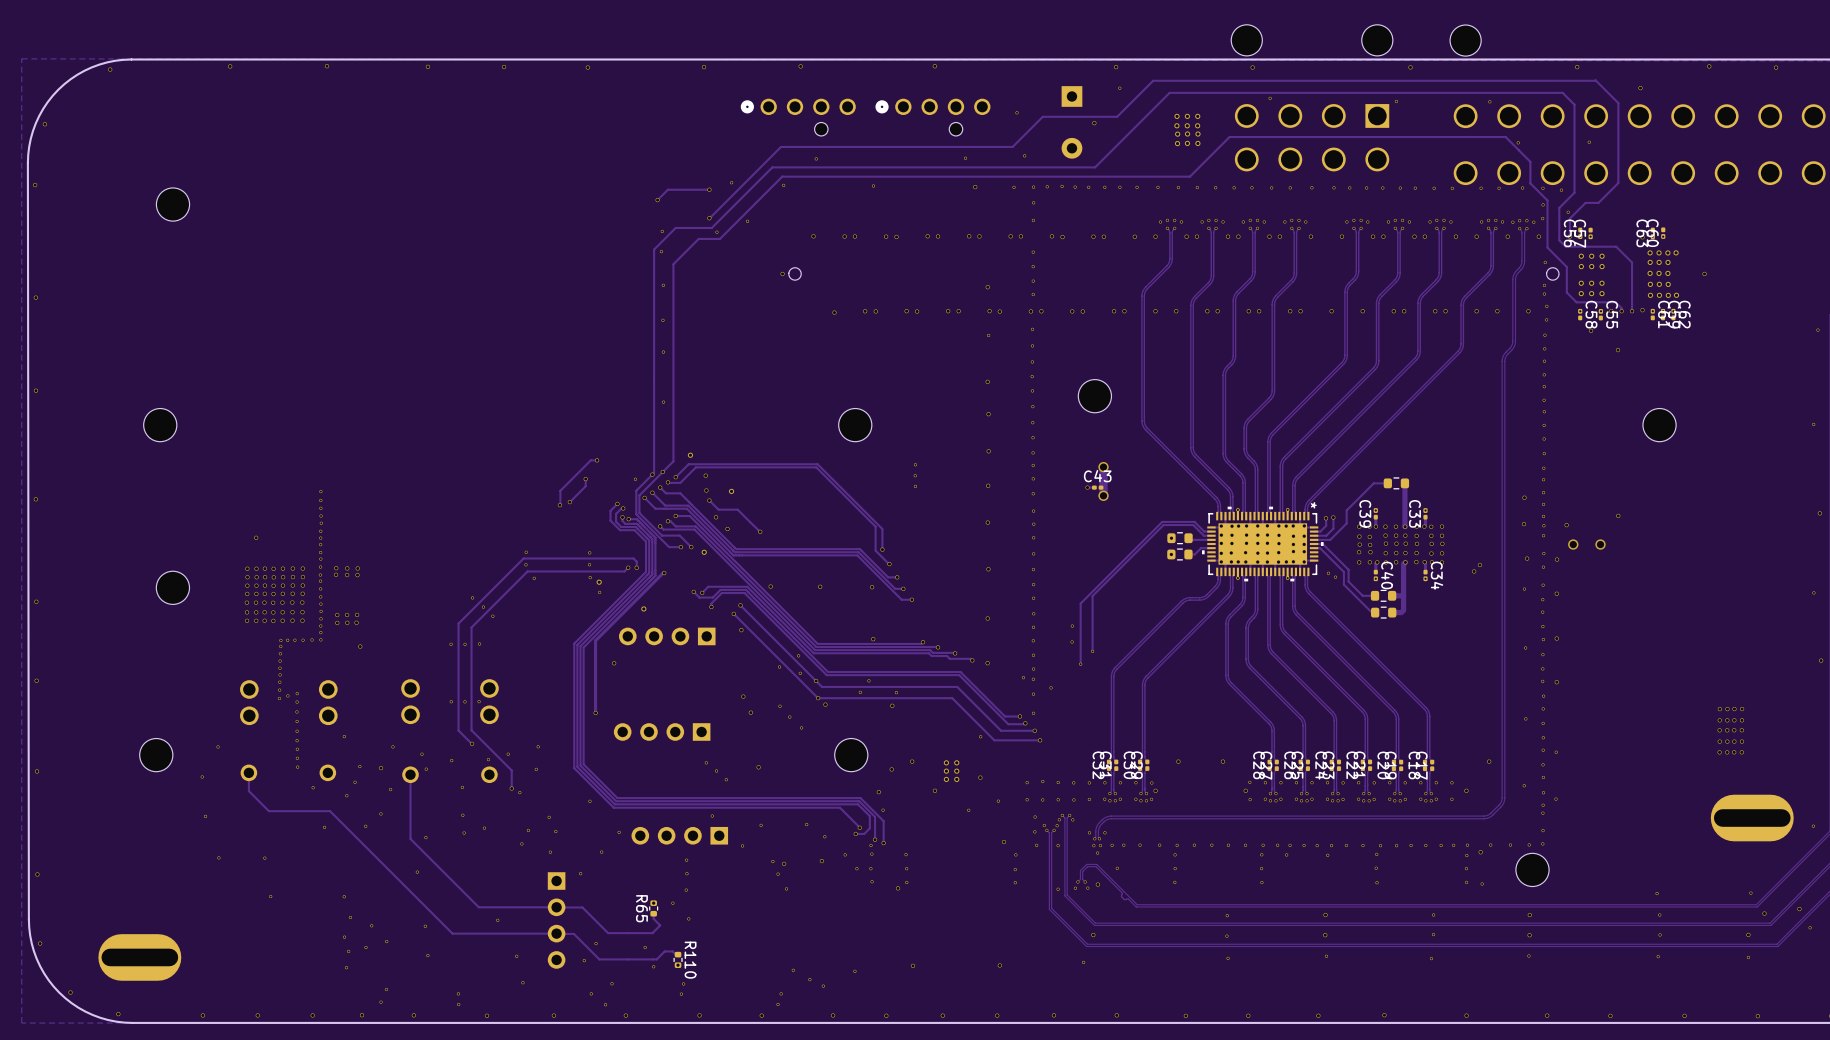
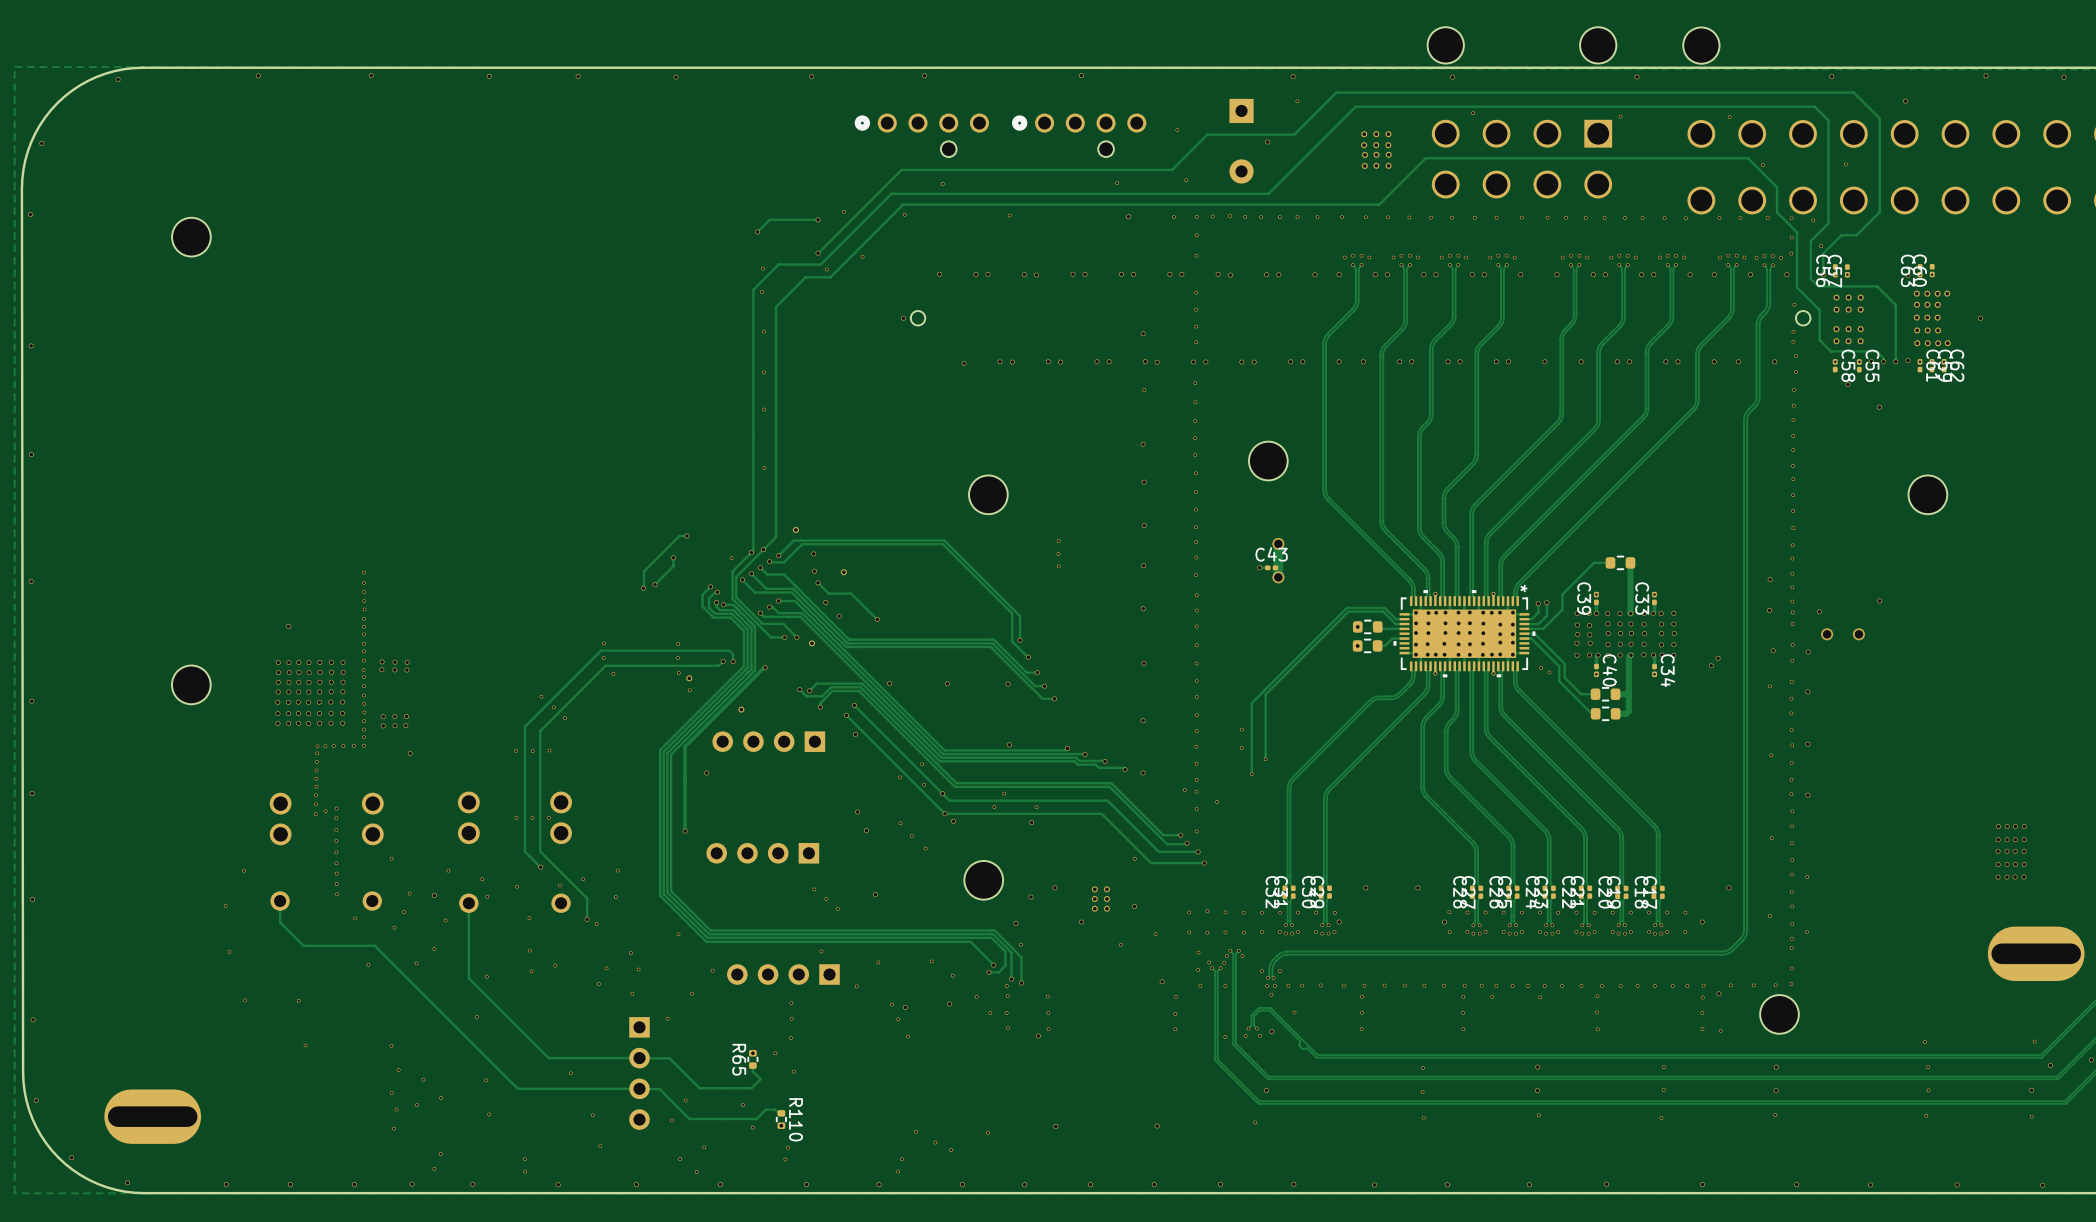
part: (160, 425) -> none
part: (156, 755) -> none

